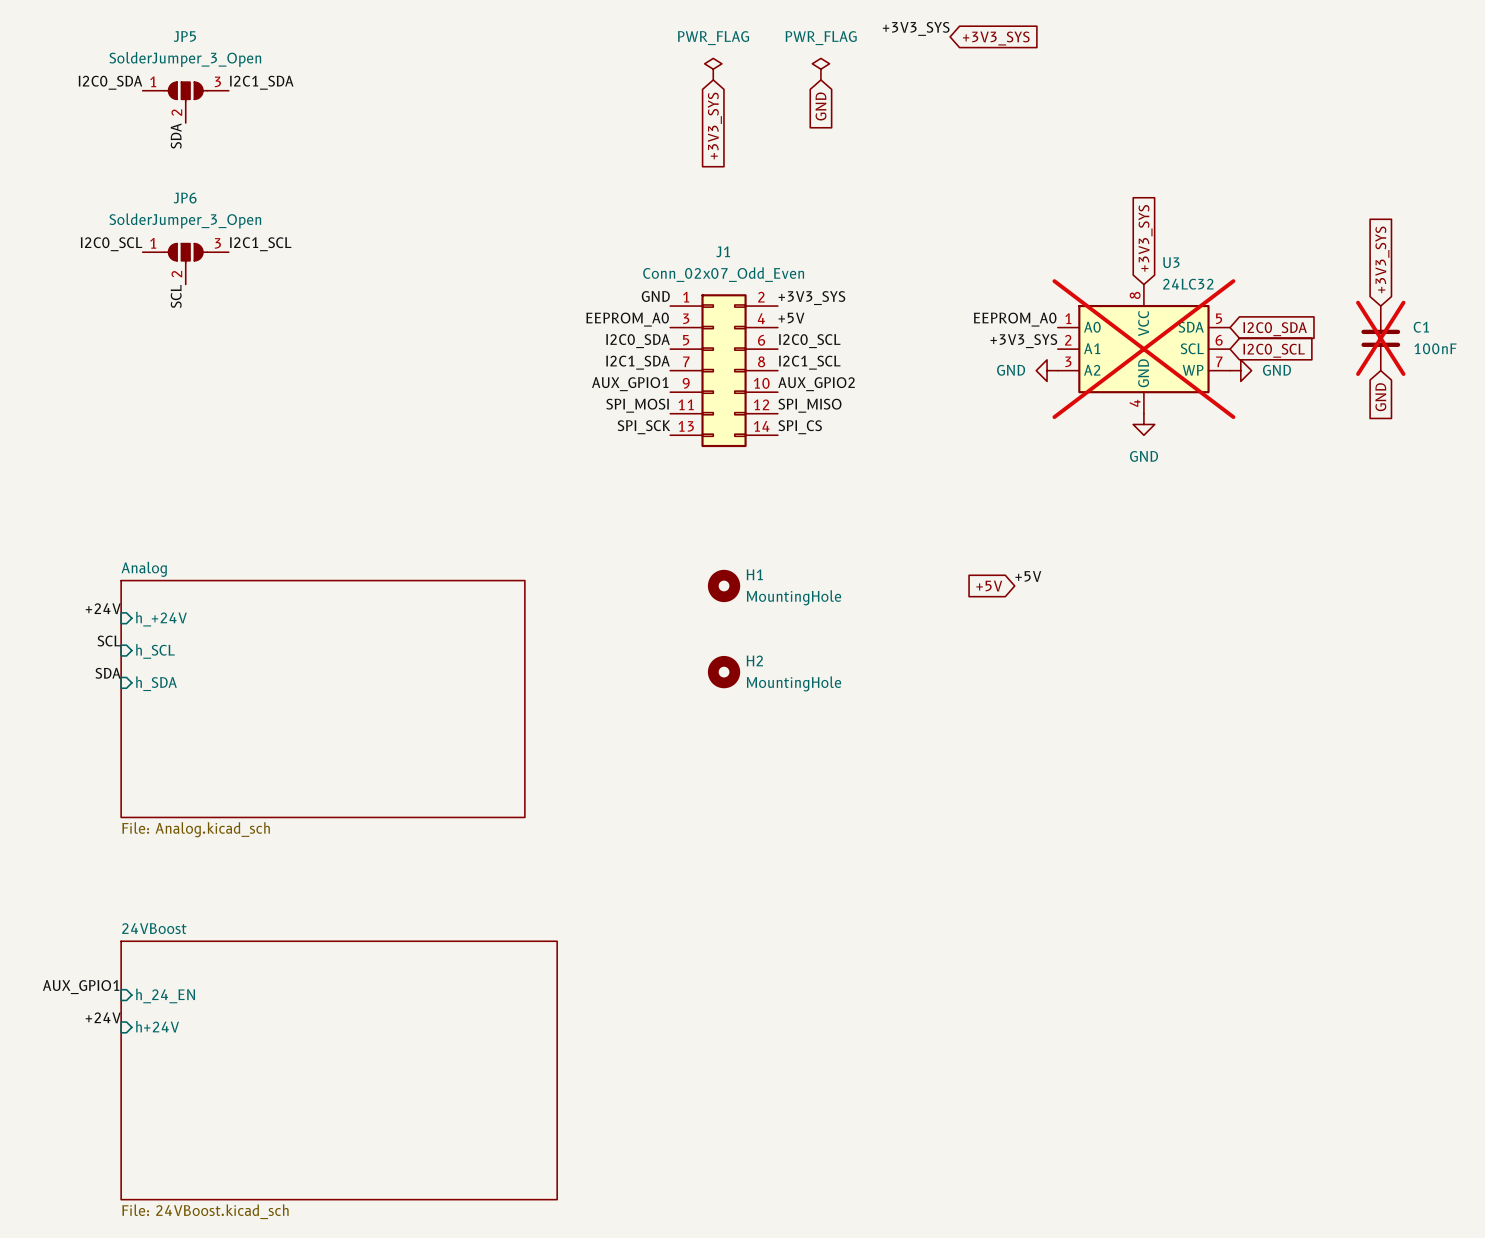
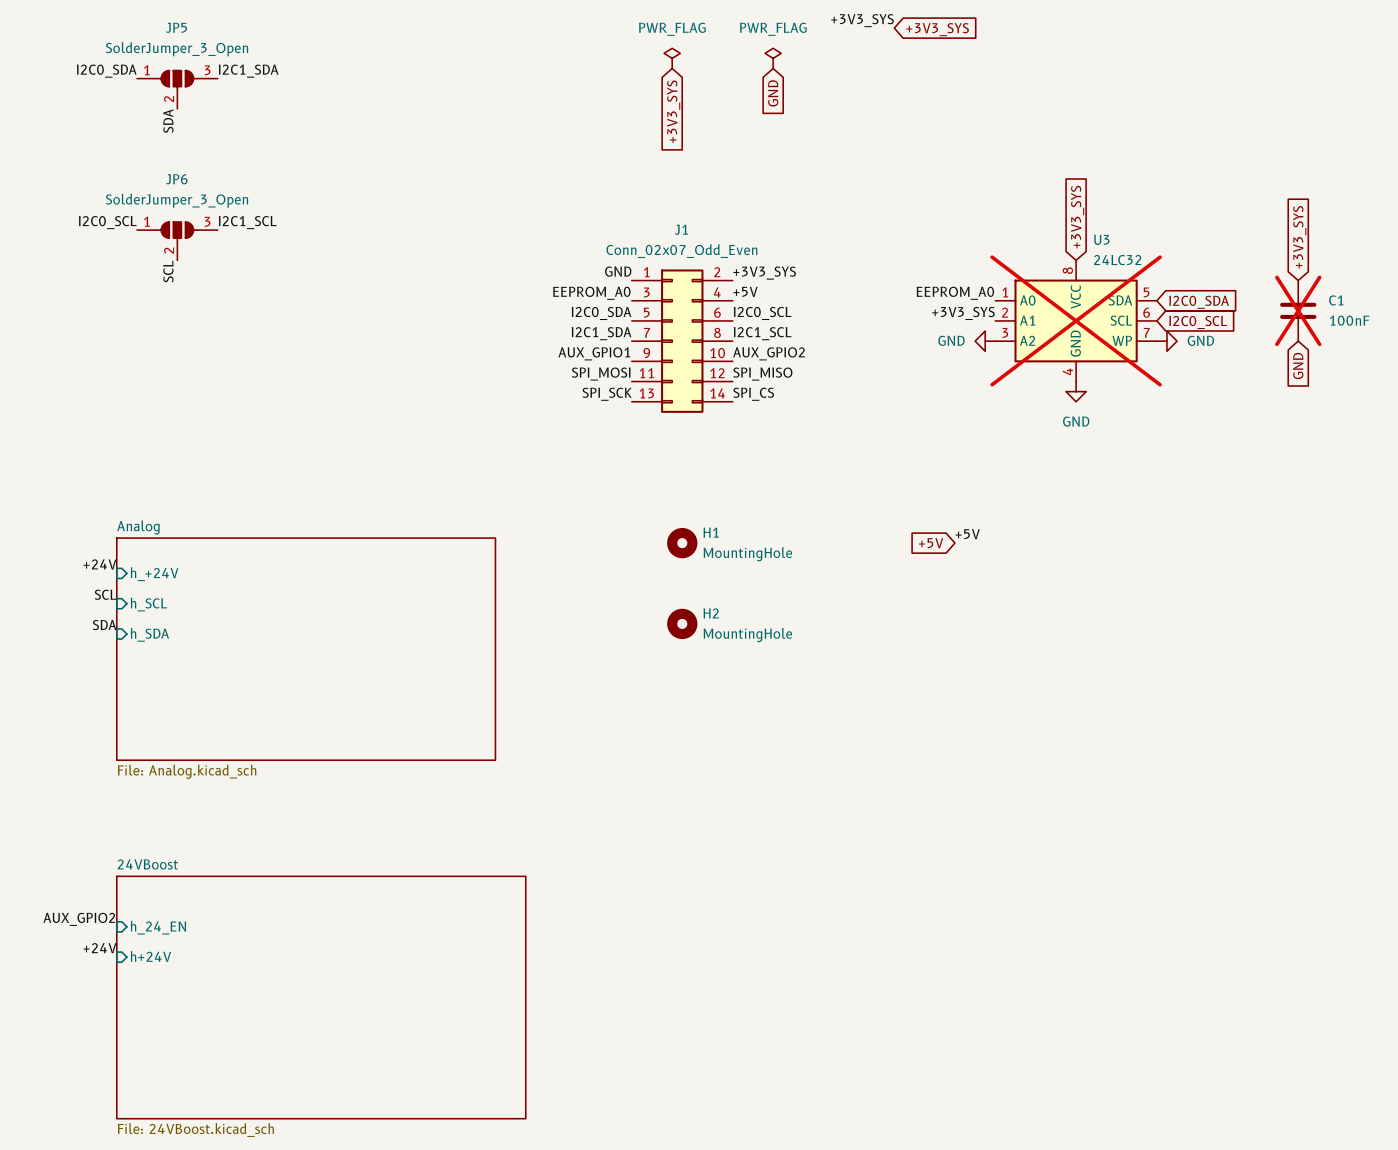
label: AUX_GPIO1 (81, 987) -> AUX_GPIO2 (79, 919)

